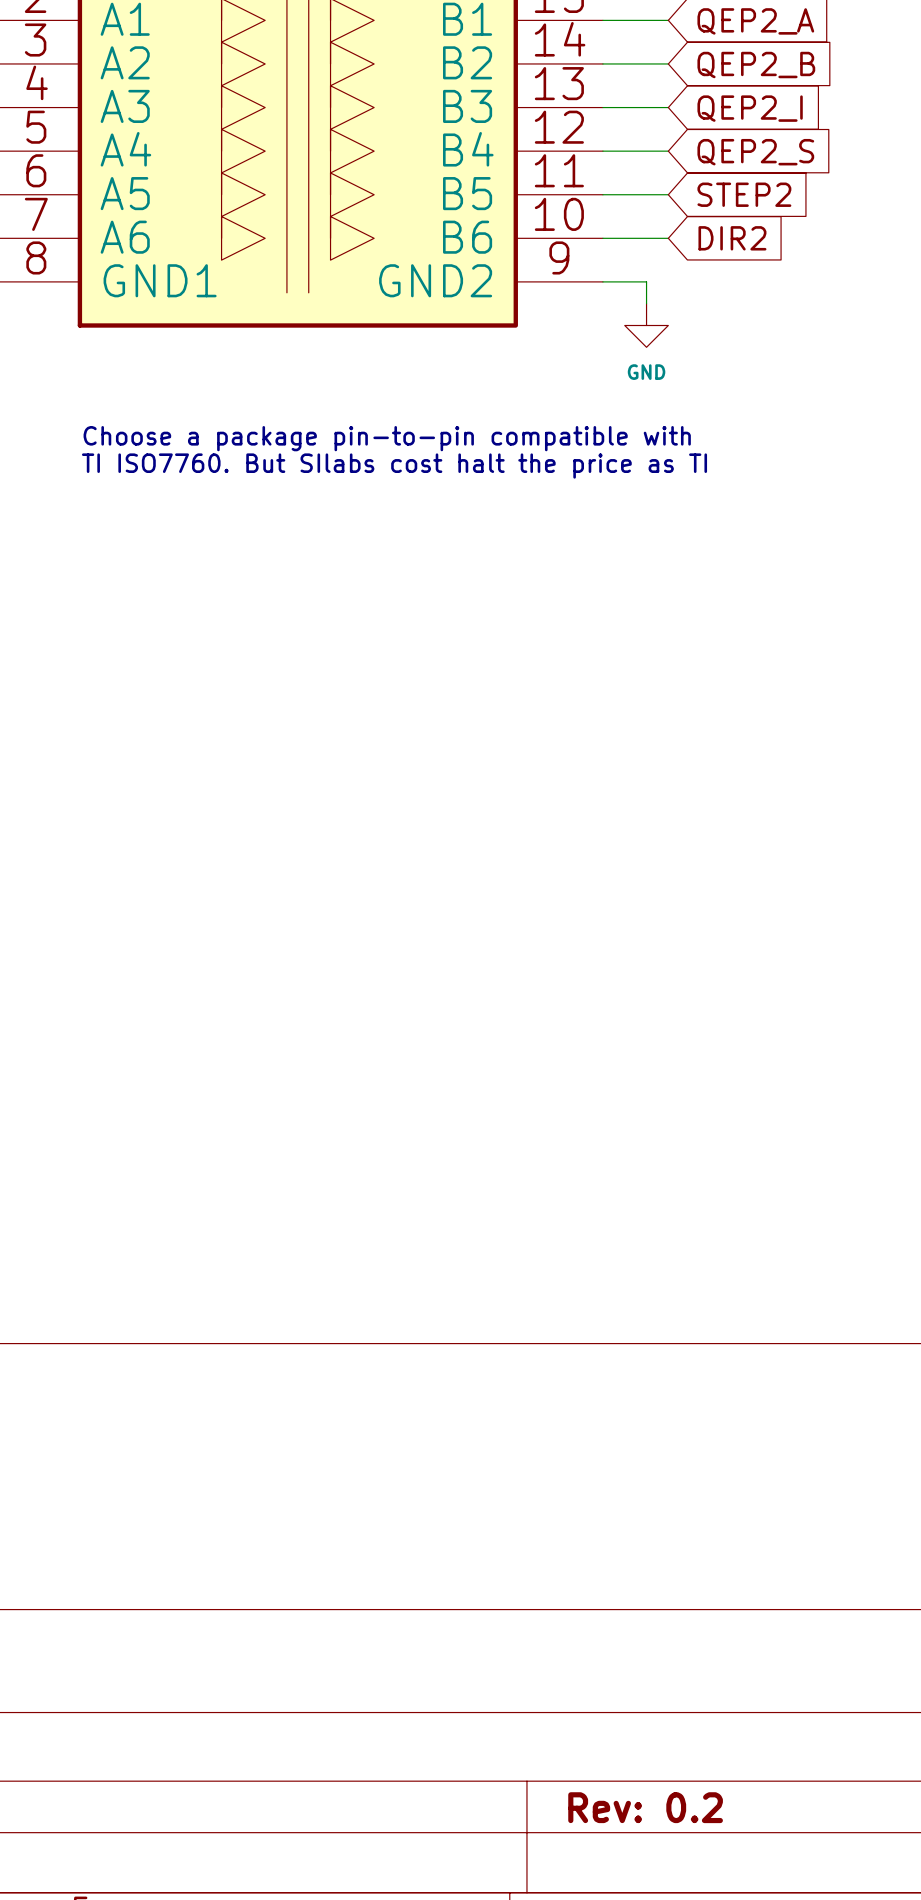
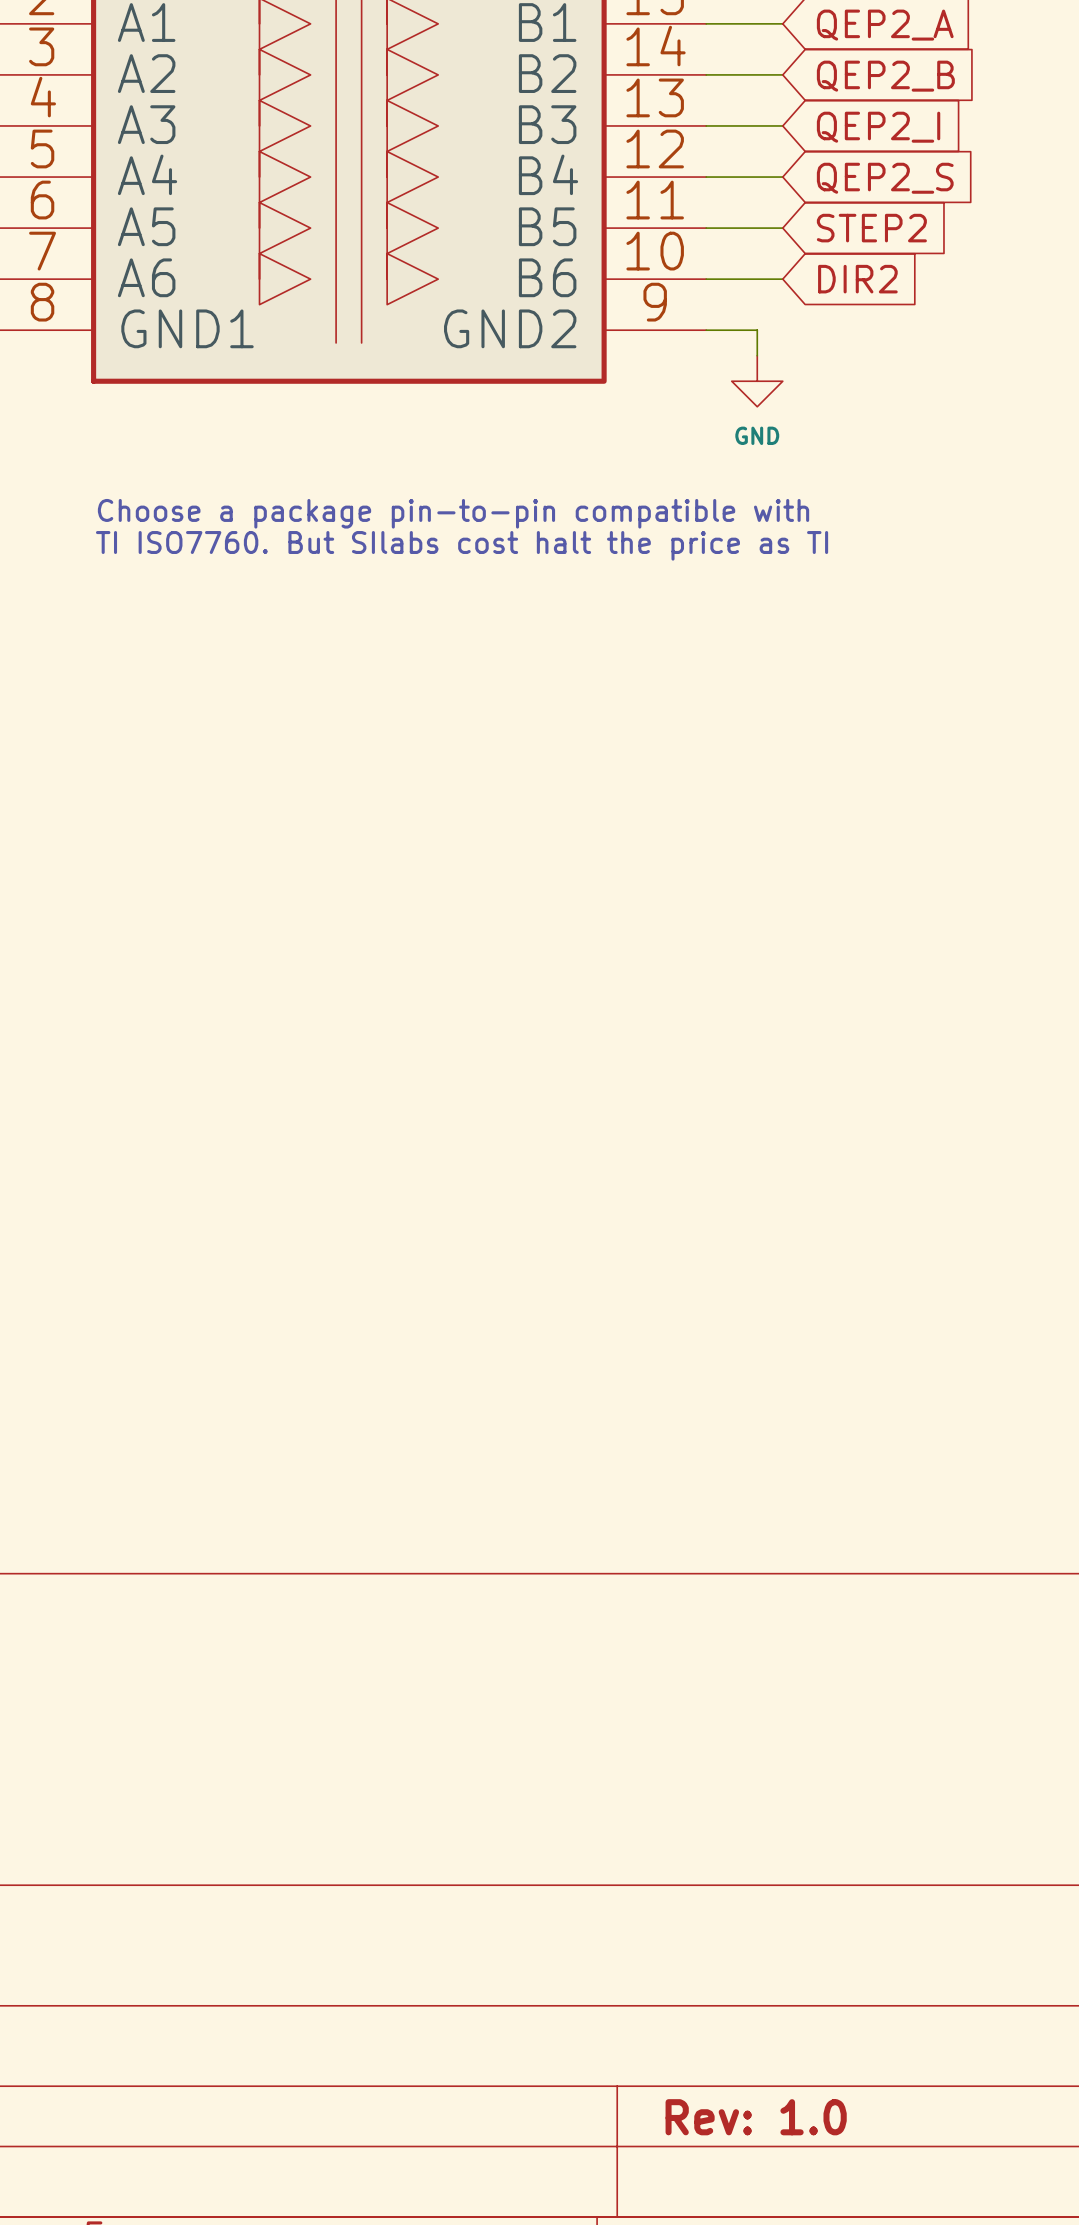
title block: Rev: 0.2 (645, 1807) -> Rev: 1.0 (756, 2117)

